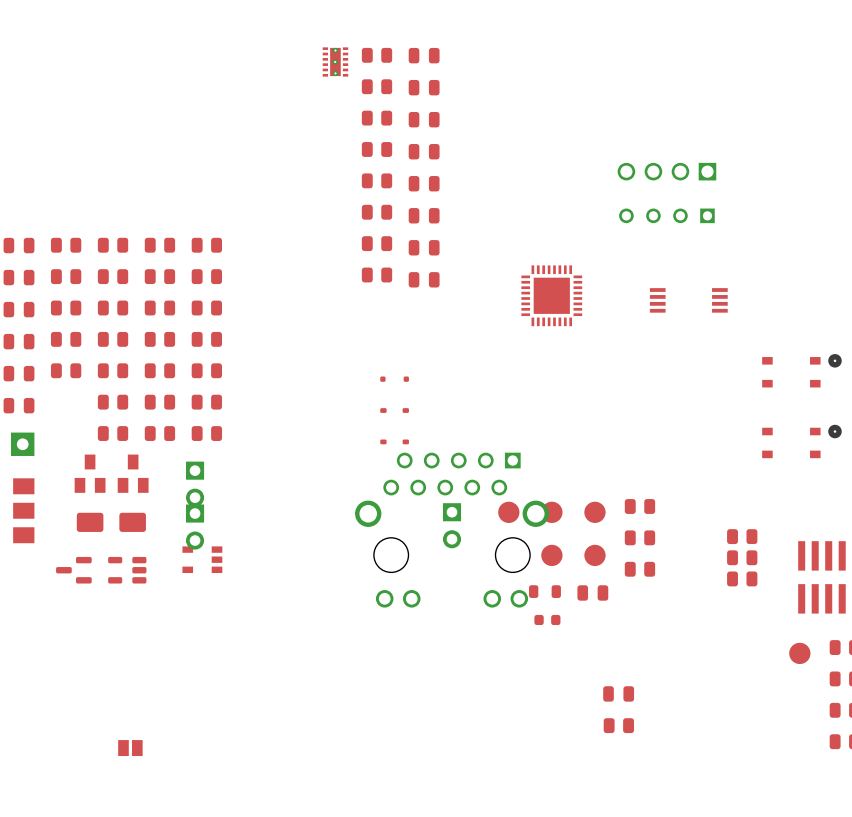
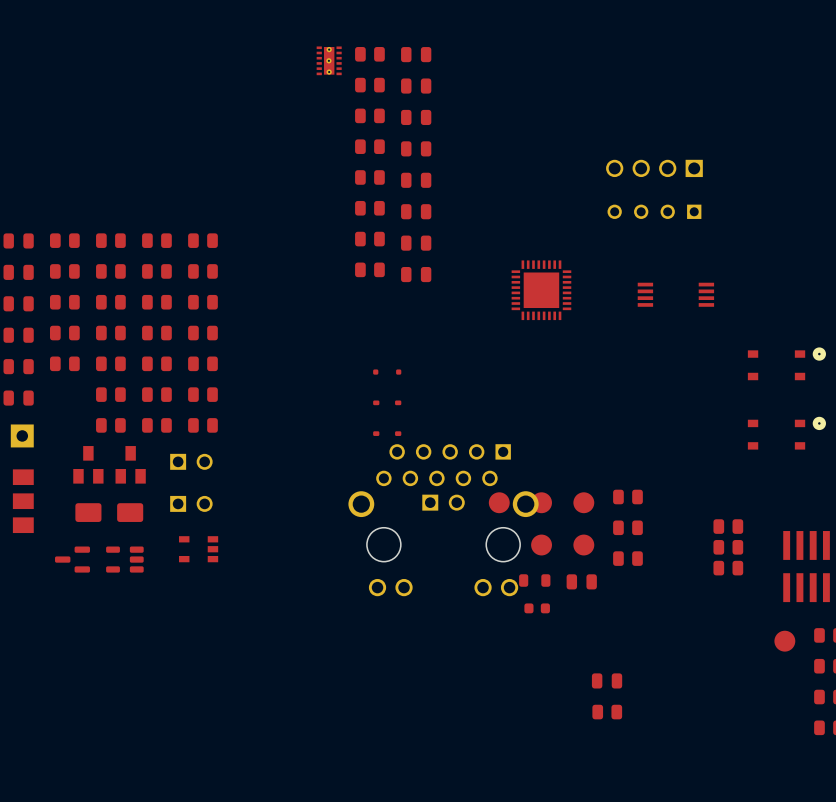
part: none -> (191, 461)
part: (195, 484) -> none
part: none -> (443, 502)
part: none -> (191, 503)
part: (452, 525) -> none
part: (195, 527) -> none
part: (130, 748) -> none

